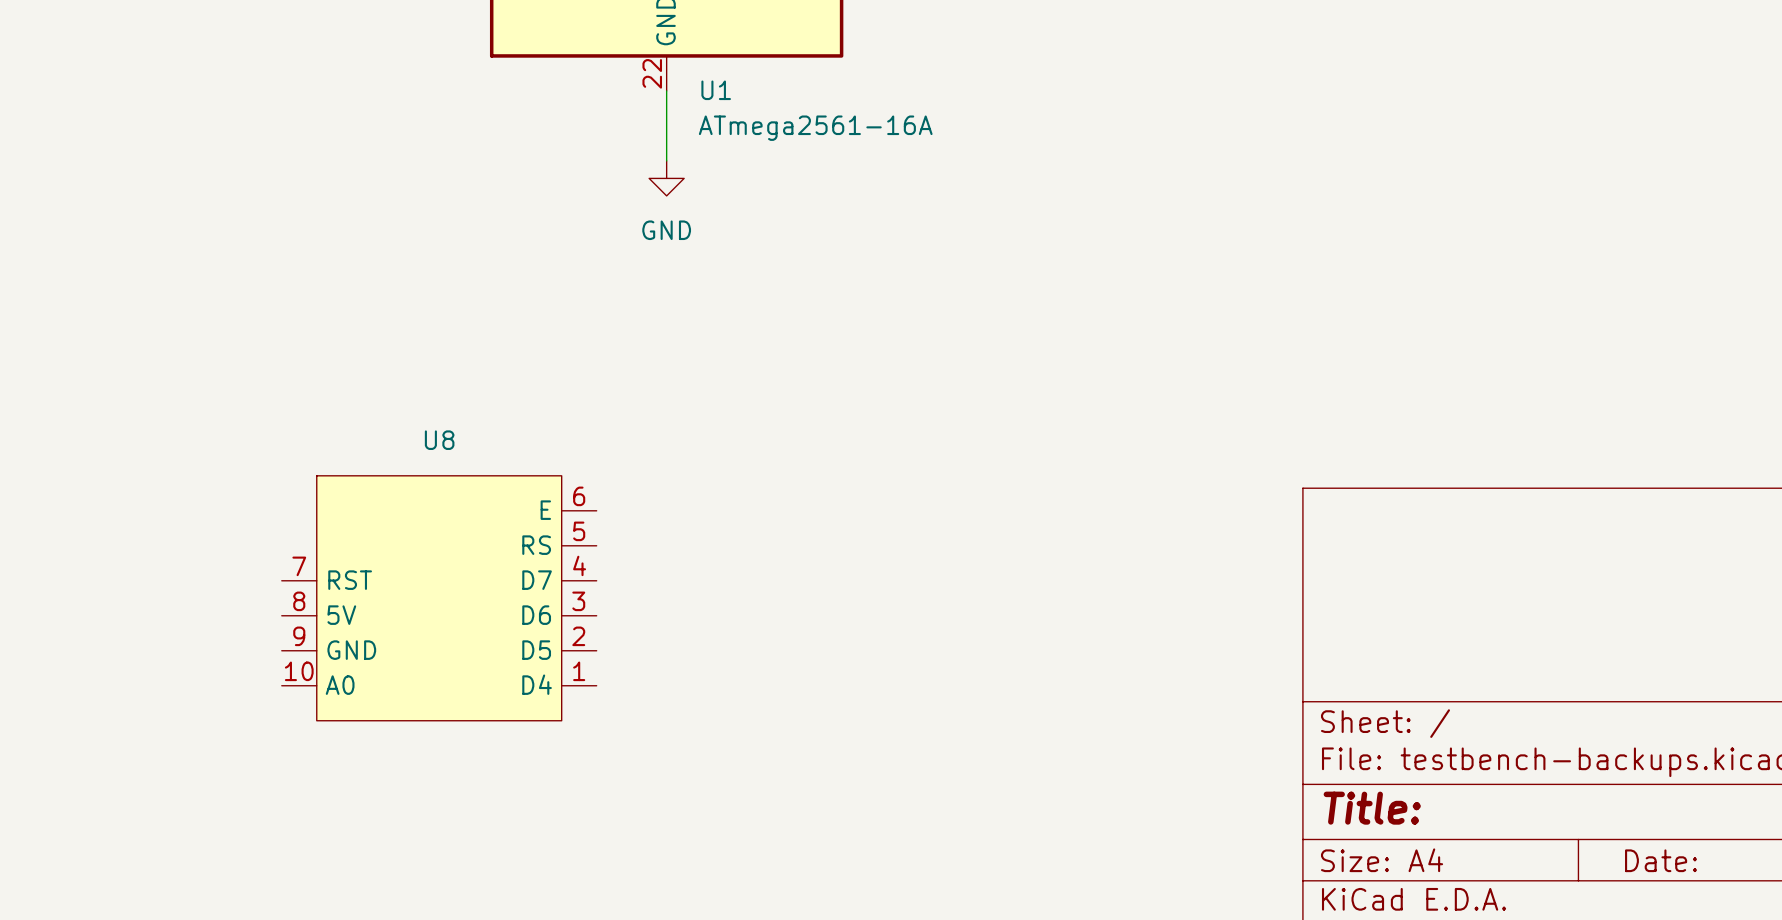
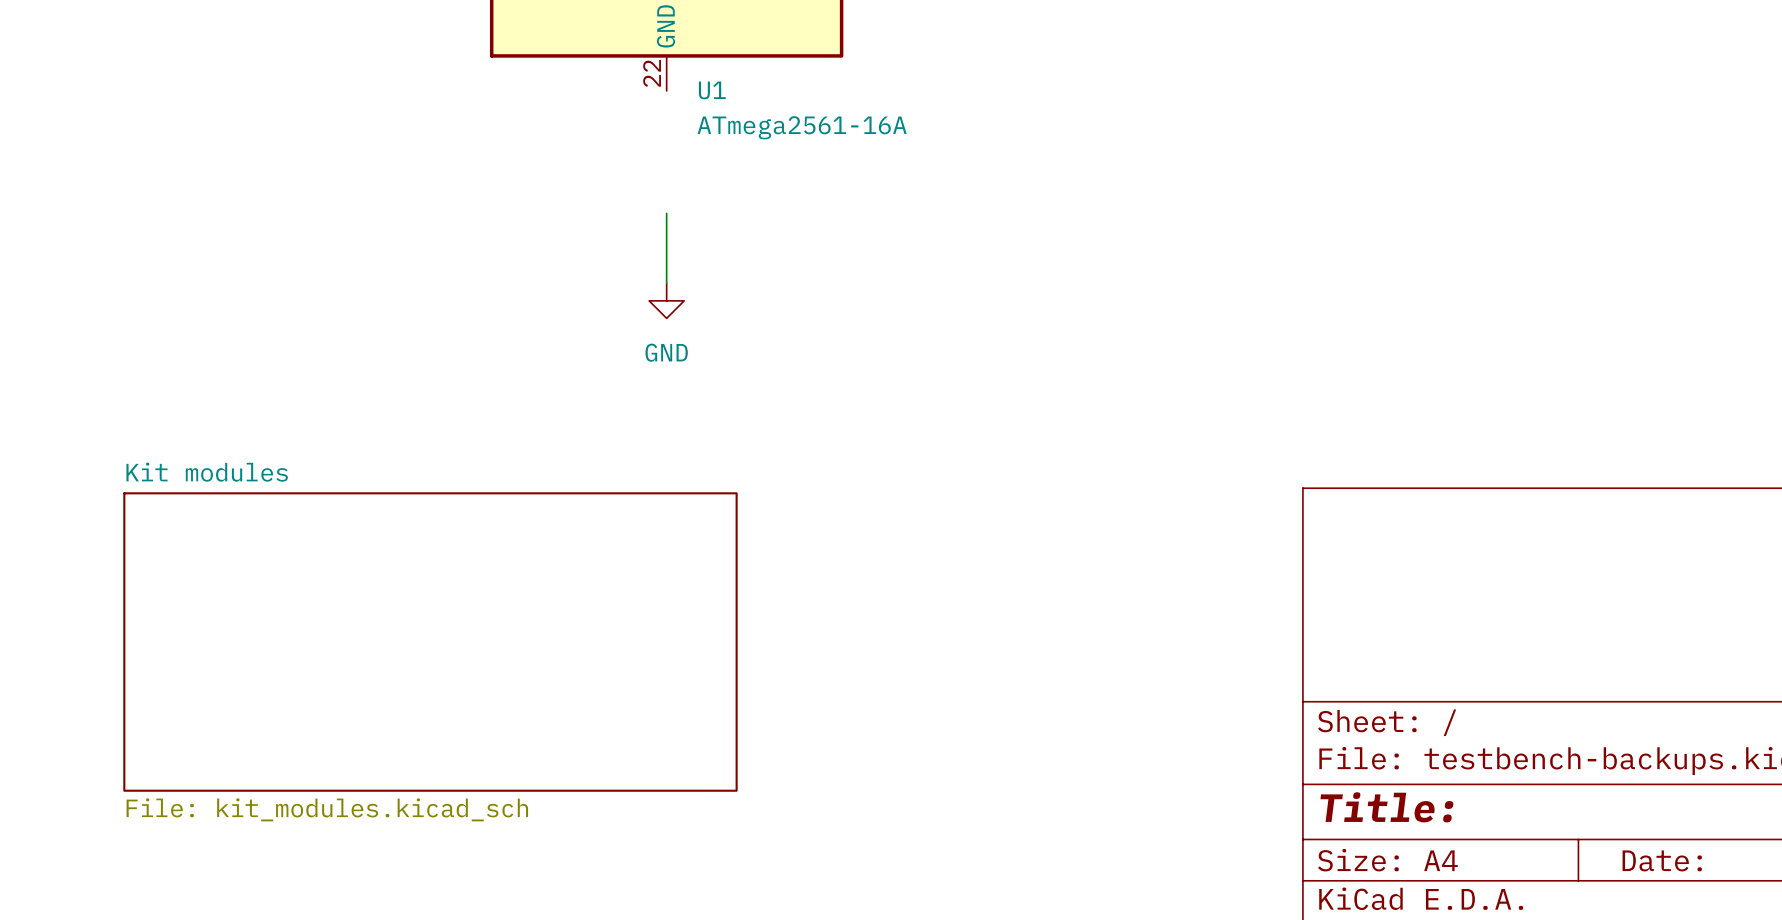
wire: (666, 90) (666, 160) -> (666, 213) (666, 283)
power symbol position: GND (666, 178) -> GND (666, 300)
U8: (439, 598) -> none
sheet Kit modules: none -> File: kit_modules.kicad_sch (430, 642)

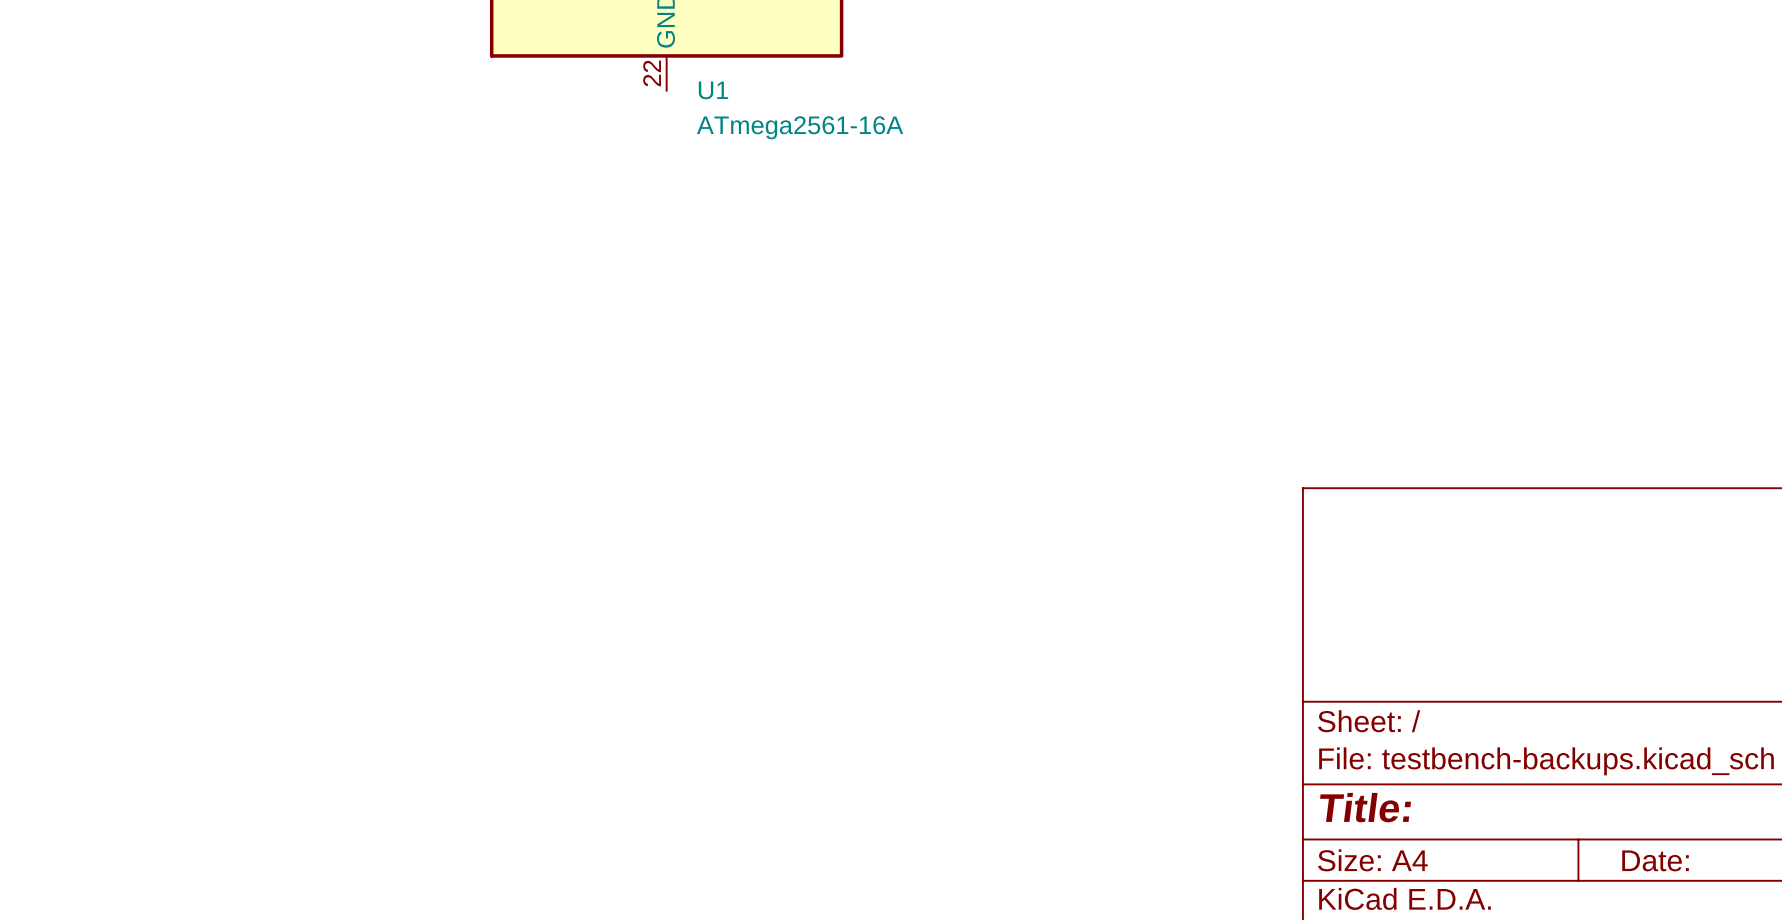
wire: (666, 213) (666, 283) -> none
power symbol: GND (666, 300) -> none
sheet Kit modules: File: kit_modules.kicad_sch (430, 642) -> none

